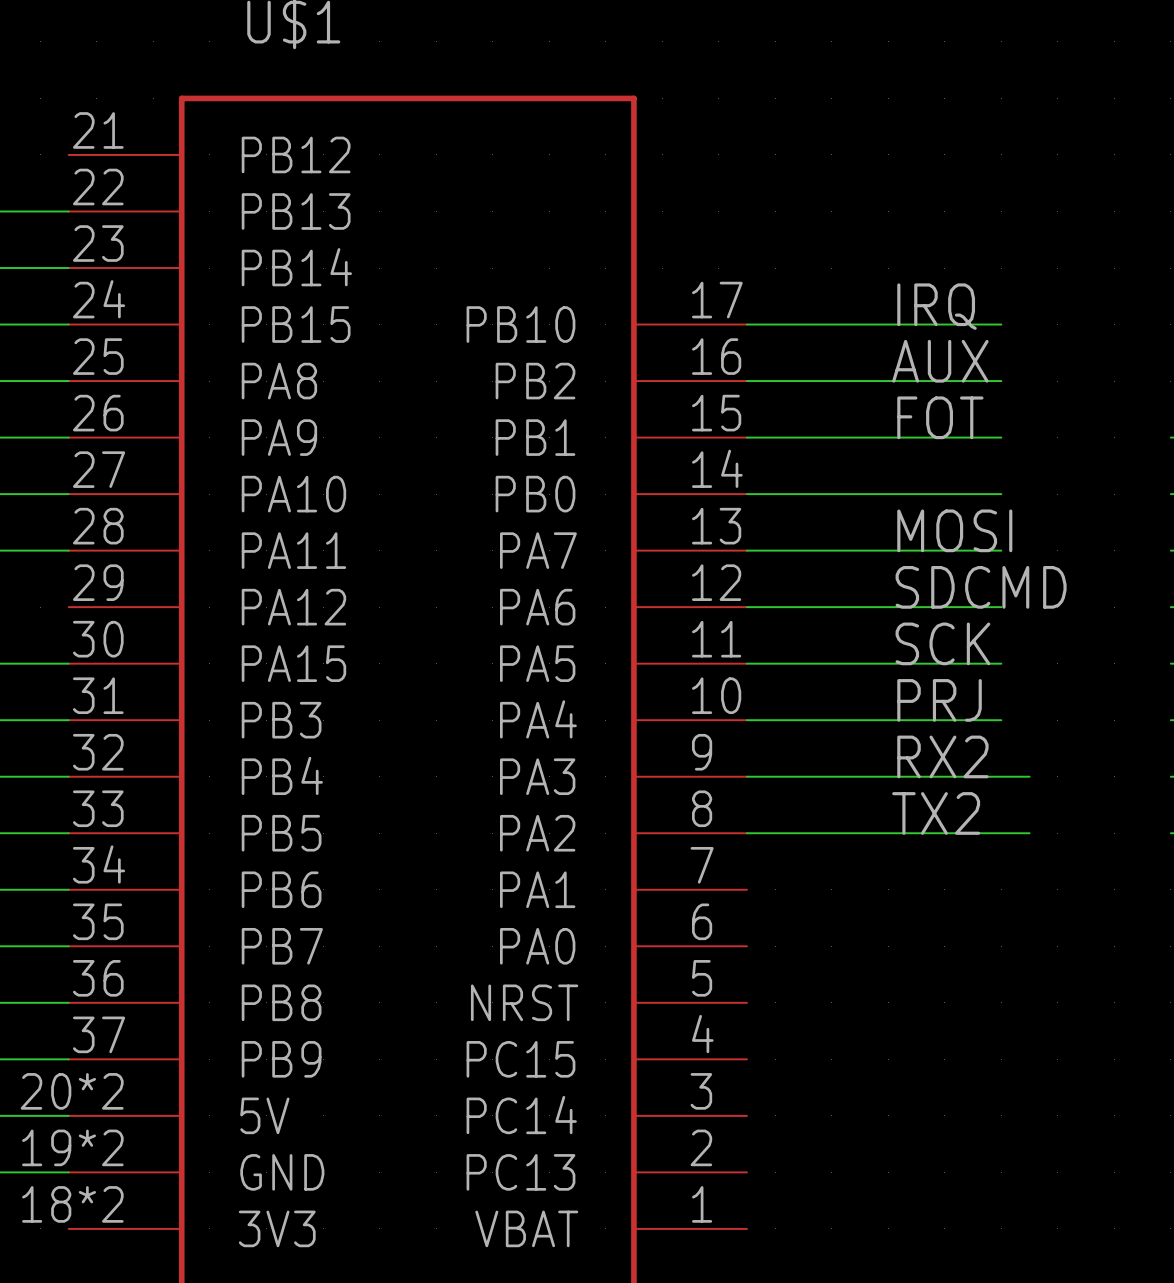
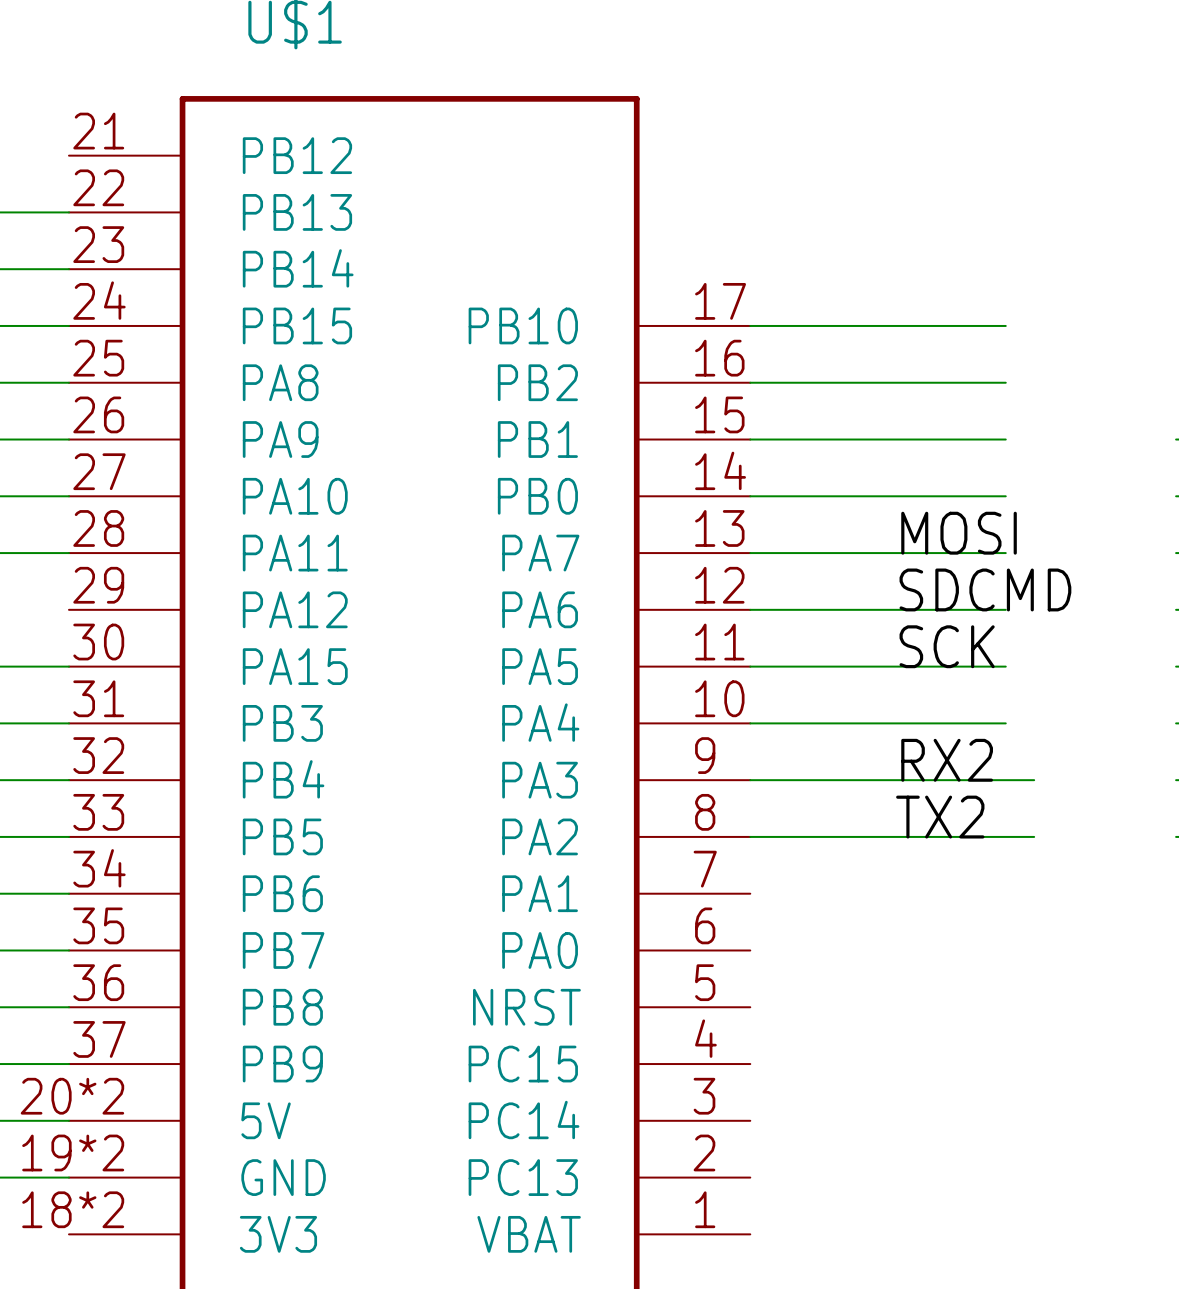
label: IRQ (936, 306) -> none
label: AUX (940, 361) -> none
label: FOT (940, 417) -> none
label: PRJ (939, 700) -> none

